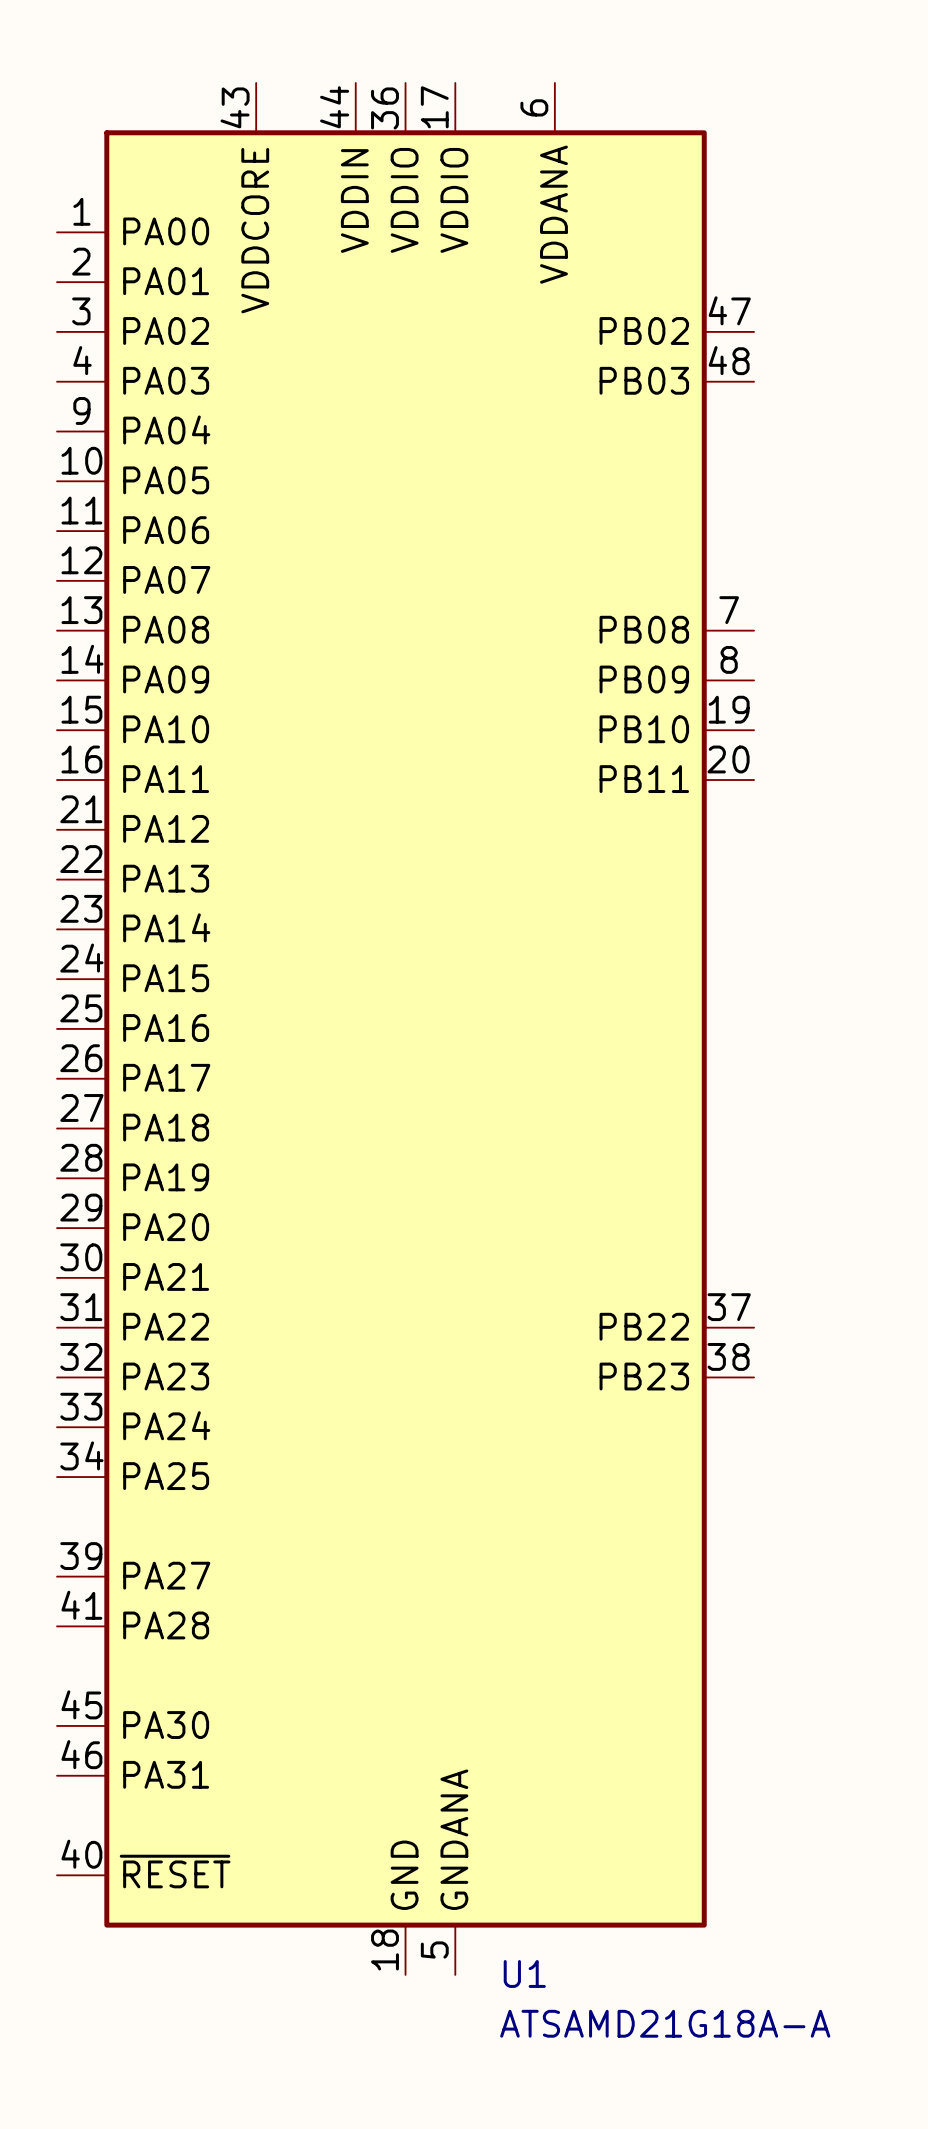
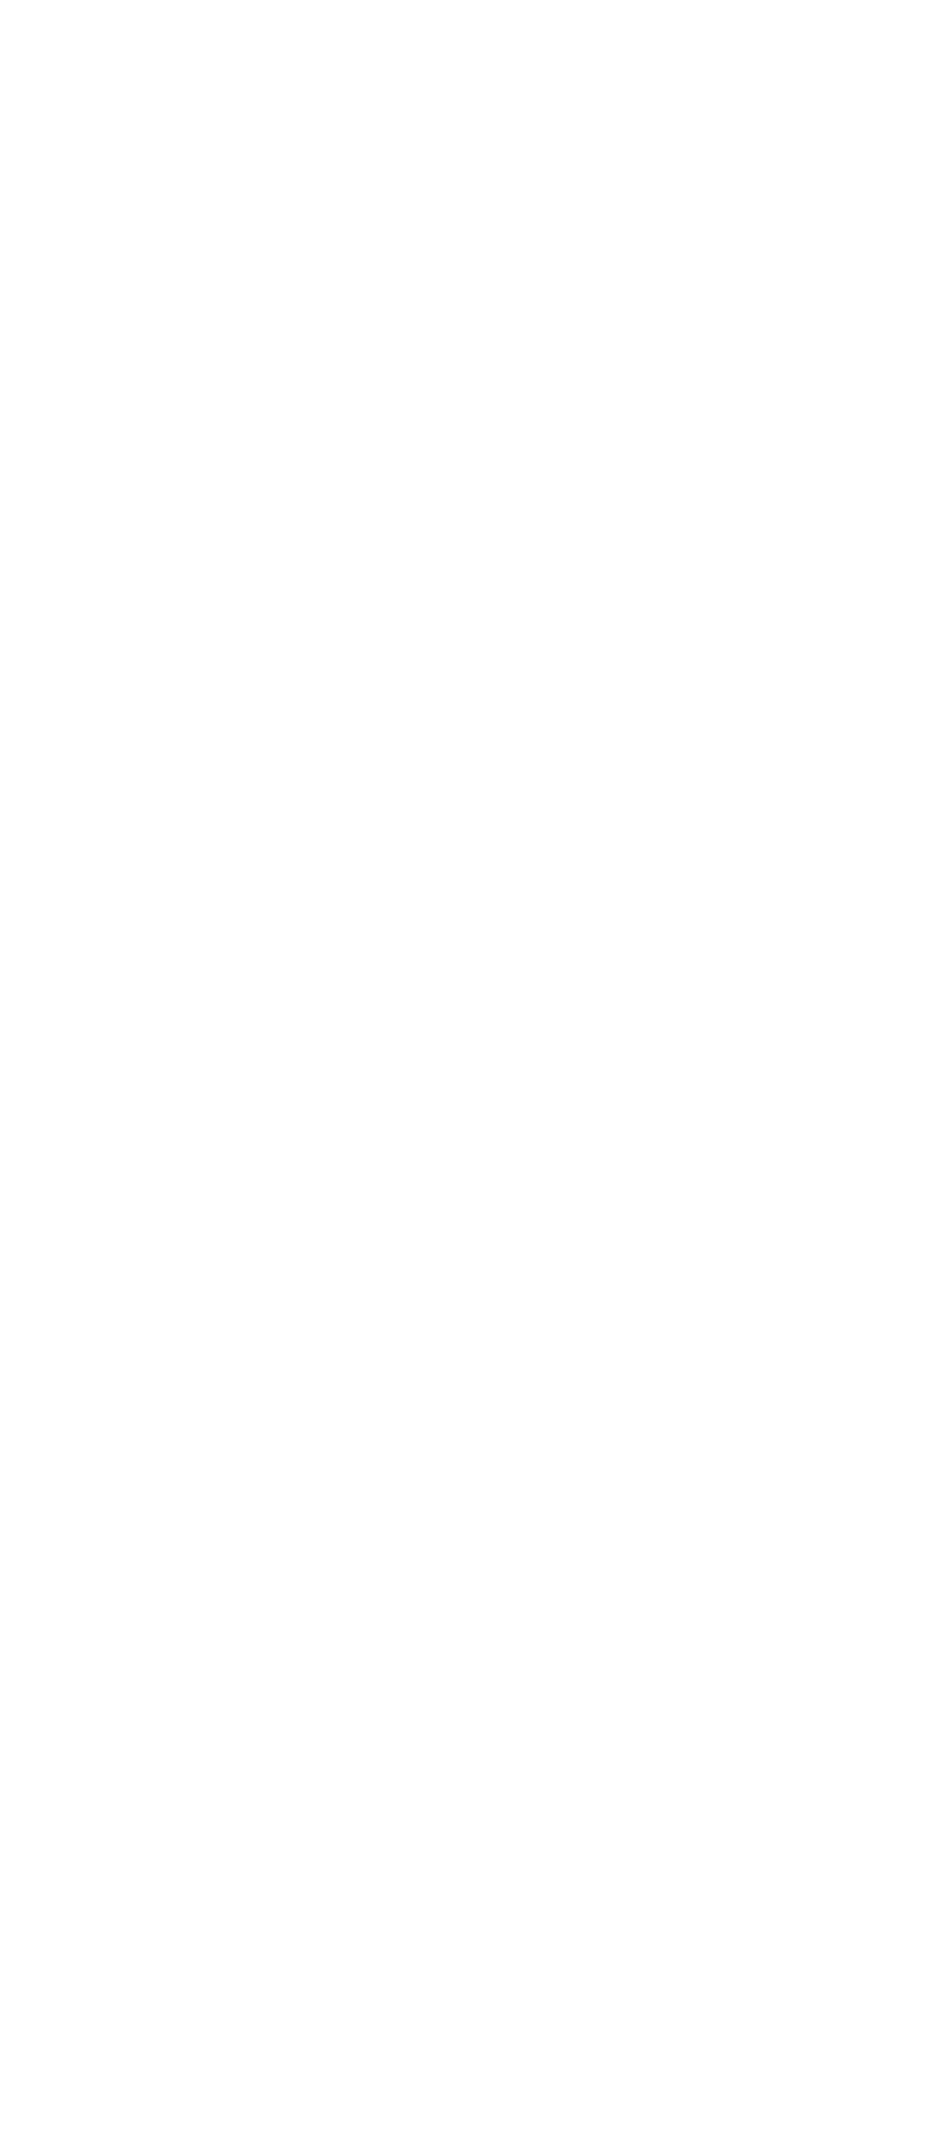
U1: ATSAMD21G18A-A (405, 1028) -> none

